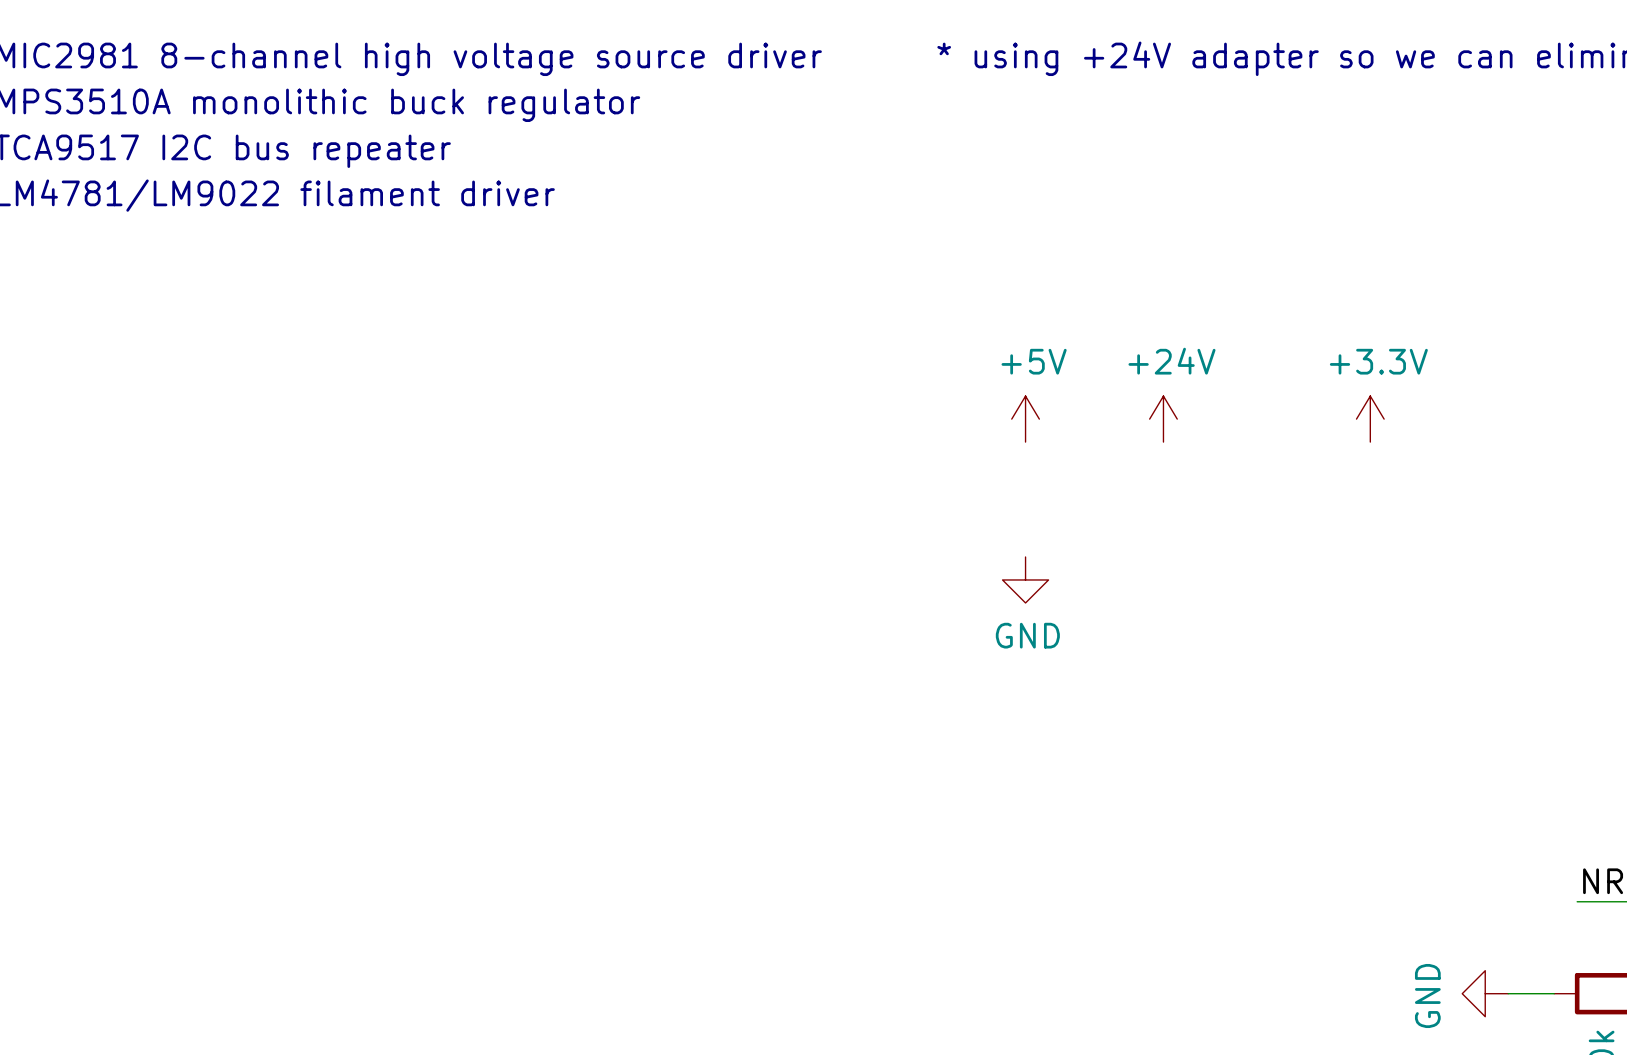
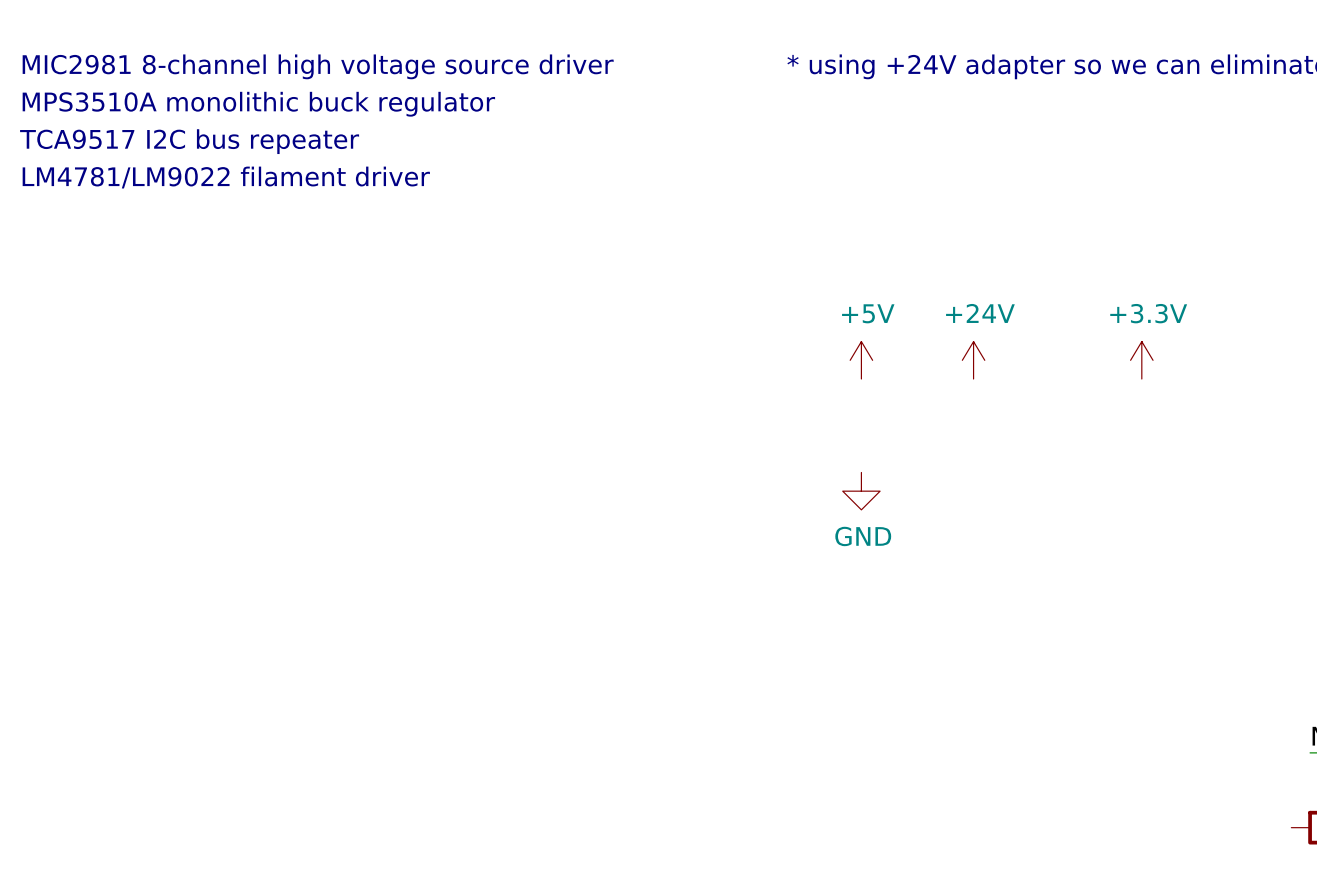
power symbol: GND (1485, 993) -> none
wire: (1508, 993) (1554, 993) -> none

